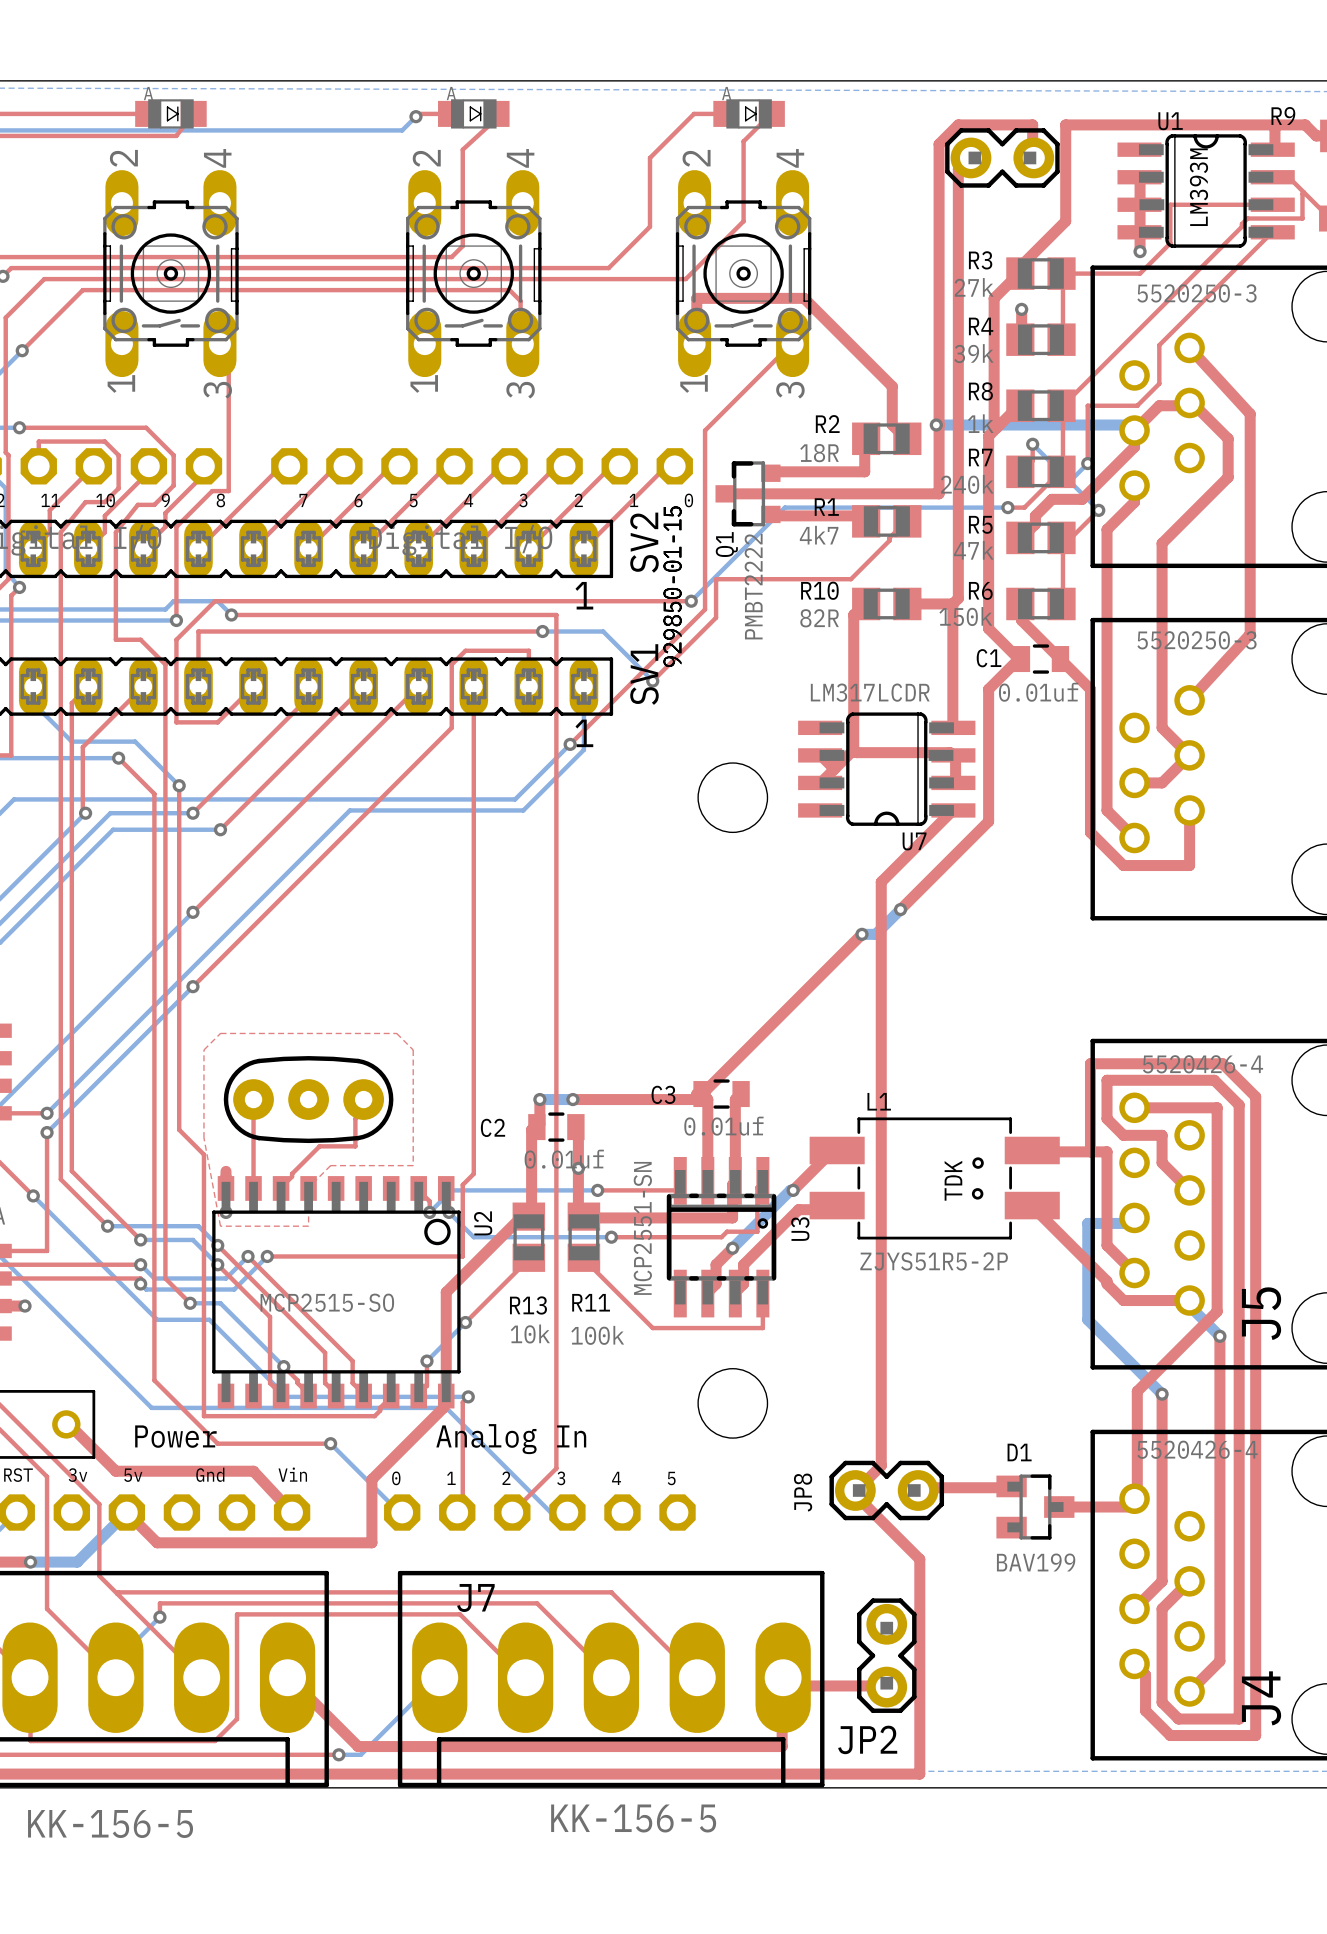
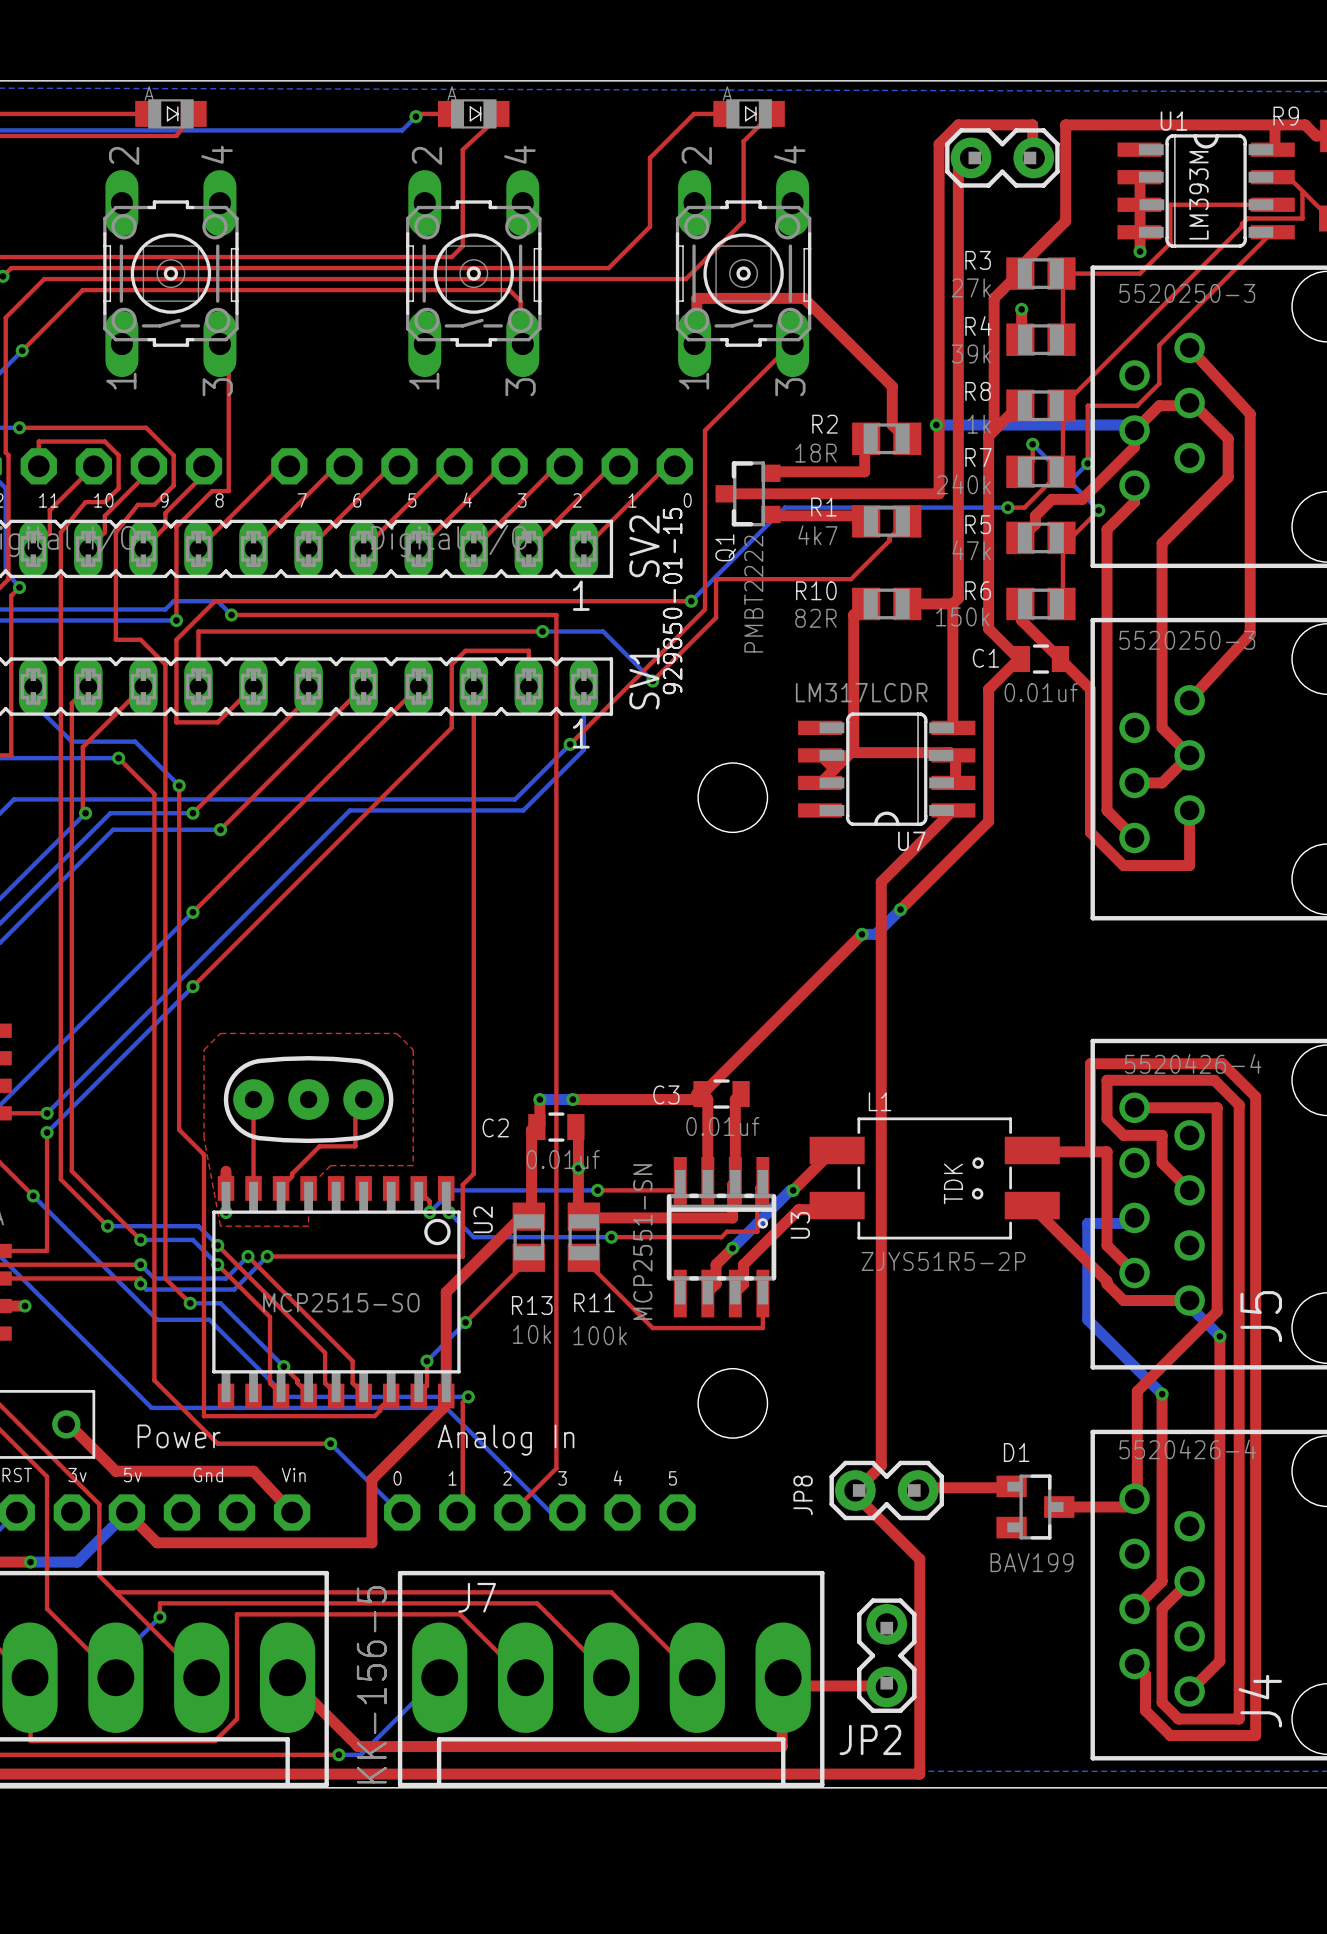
J7 value rotation: 0° (633, 1818) -> 90° counterclockwise (371, 1684)
J7 value position: KK-156-5 (633, 1818) -> KK-156-5 (371, 1684)
part value rotation: 0° (110, 1824) -> 90° counterclockwise (371, 1684)
part value position: KK-156-5 (110, 1824) -> KK-156-5 (371, 1684)

